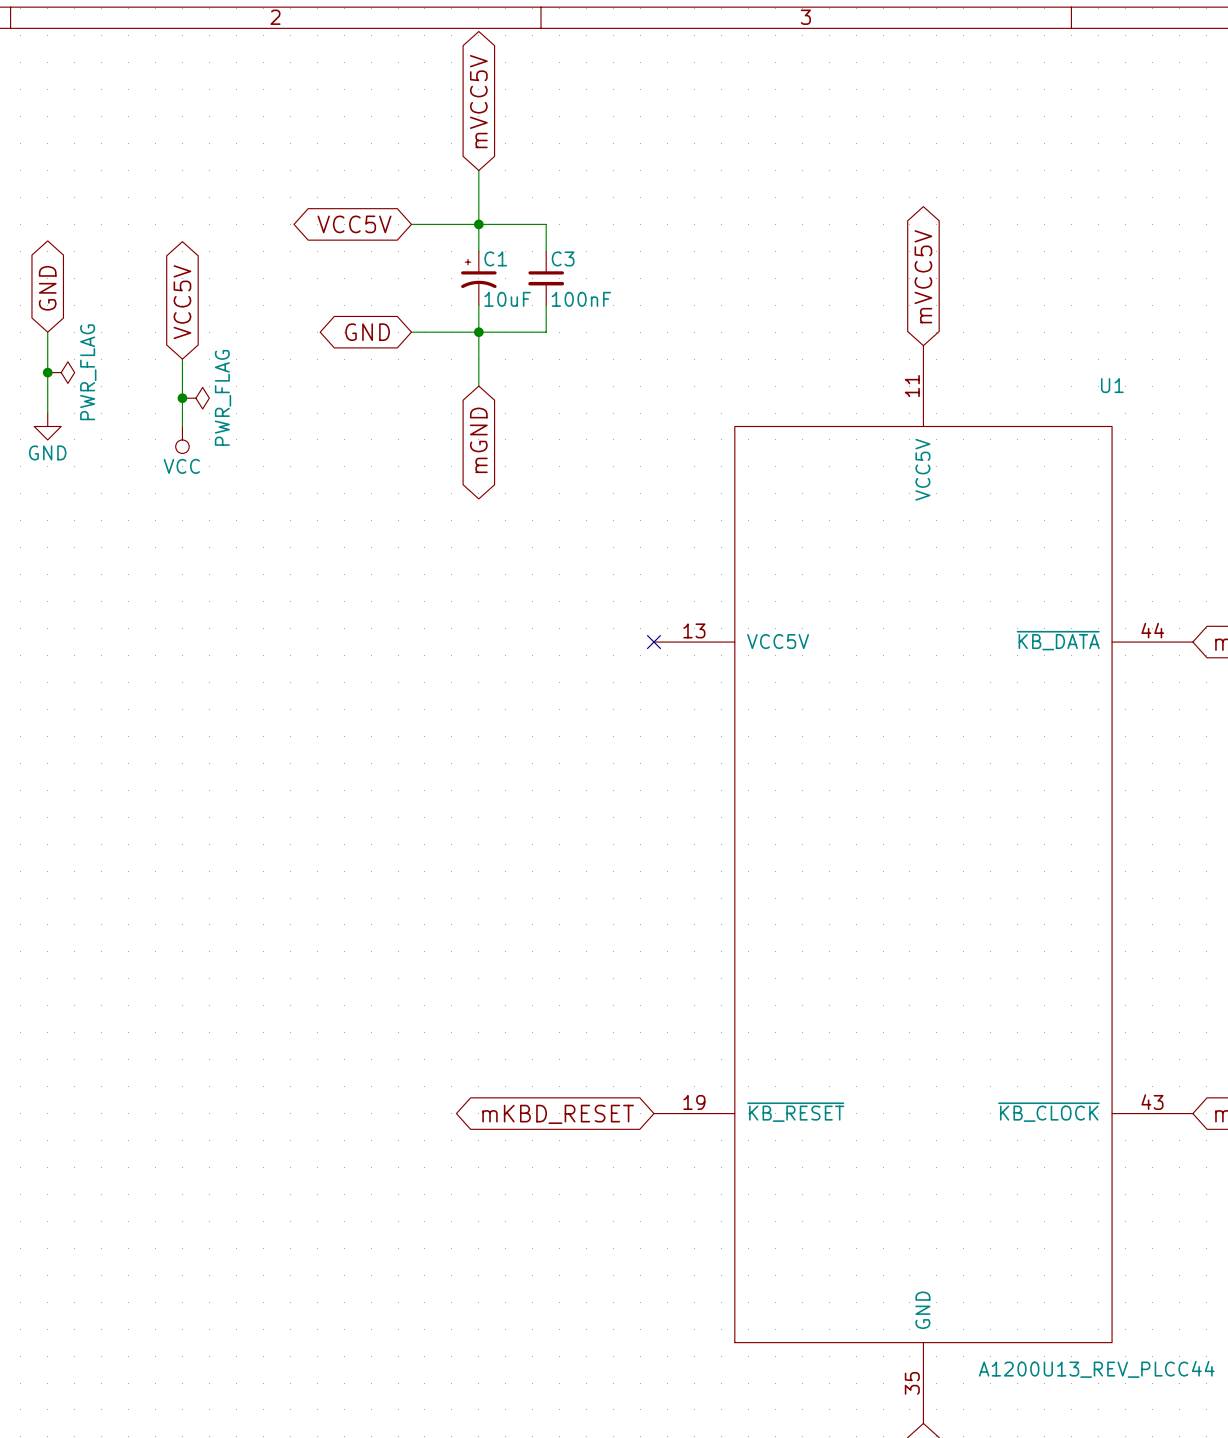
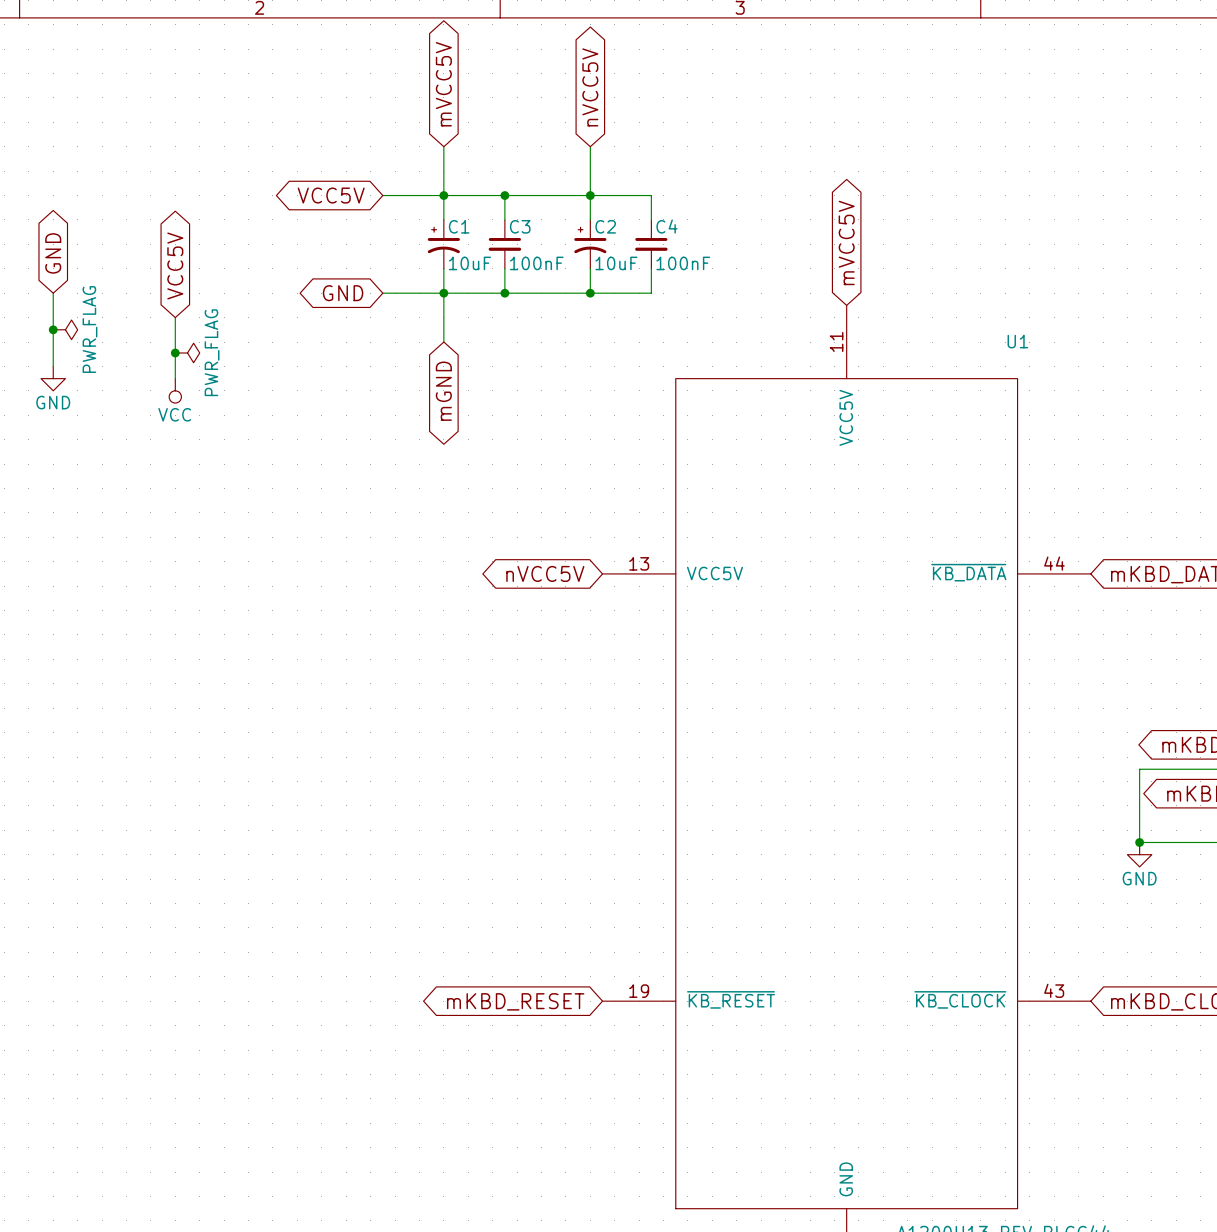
global label: none -> nVCC5V (590, 87)
wire: none -> (590, 146) (590, 219)
wire: none -> (504, 195) (651, 195) (651, 219)
junction: none -> (504, 195)
junction: none -> (590, 195)
C2: none -> 10uF (590, 244)
C4: none -> 100nF (651, 244)
wire: none -> (590, 268) (590, 293)
wire: none -> (651, 268) (651, 293) (504, 293)
junction: none -> (504, 293)
junction: none -> (590, 293)
global label: none -> nVCC5V (545, 573)
no-connect mark: (653, 642) -> none

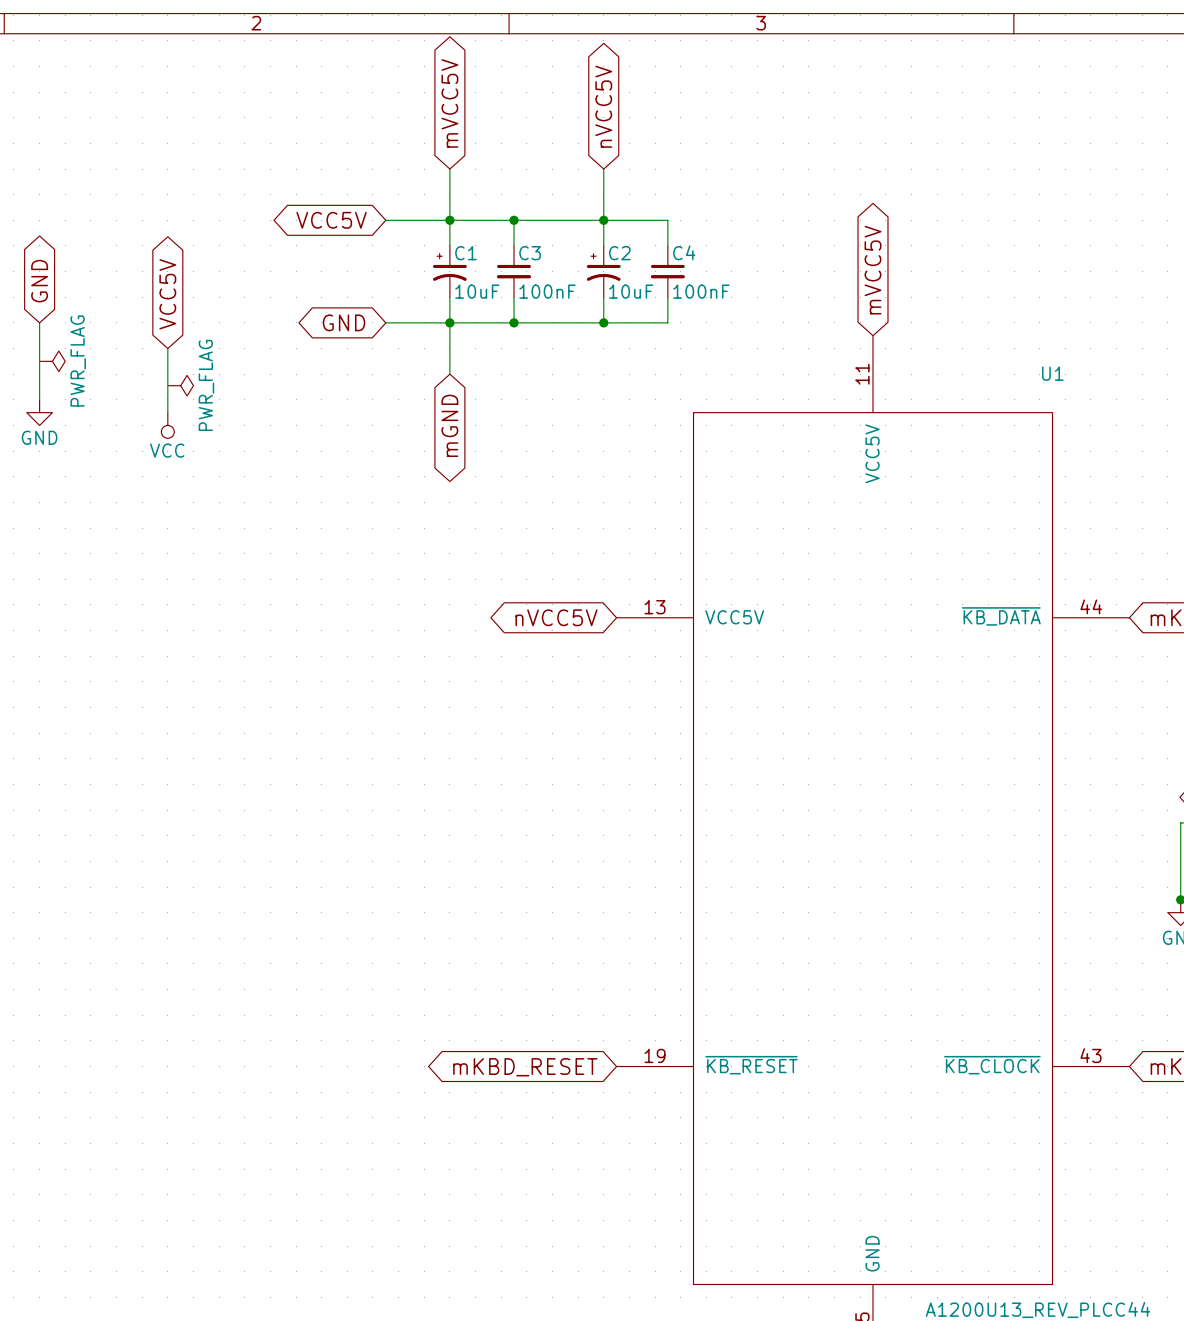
junction: (53, 329) -> none
junction: (175, 353) -> none

